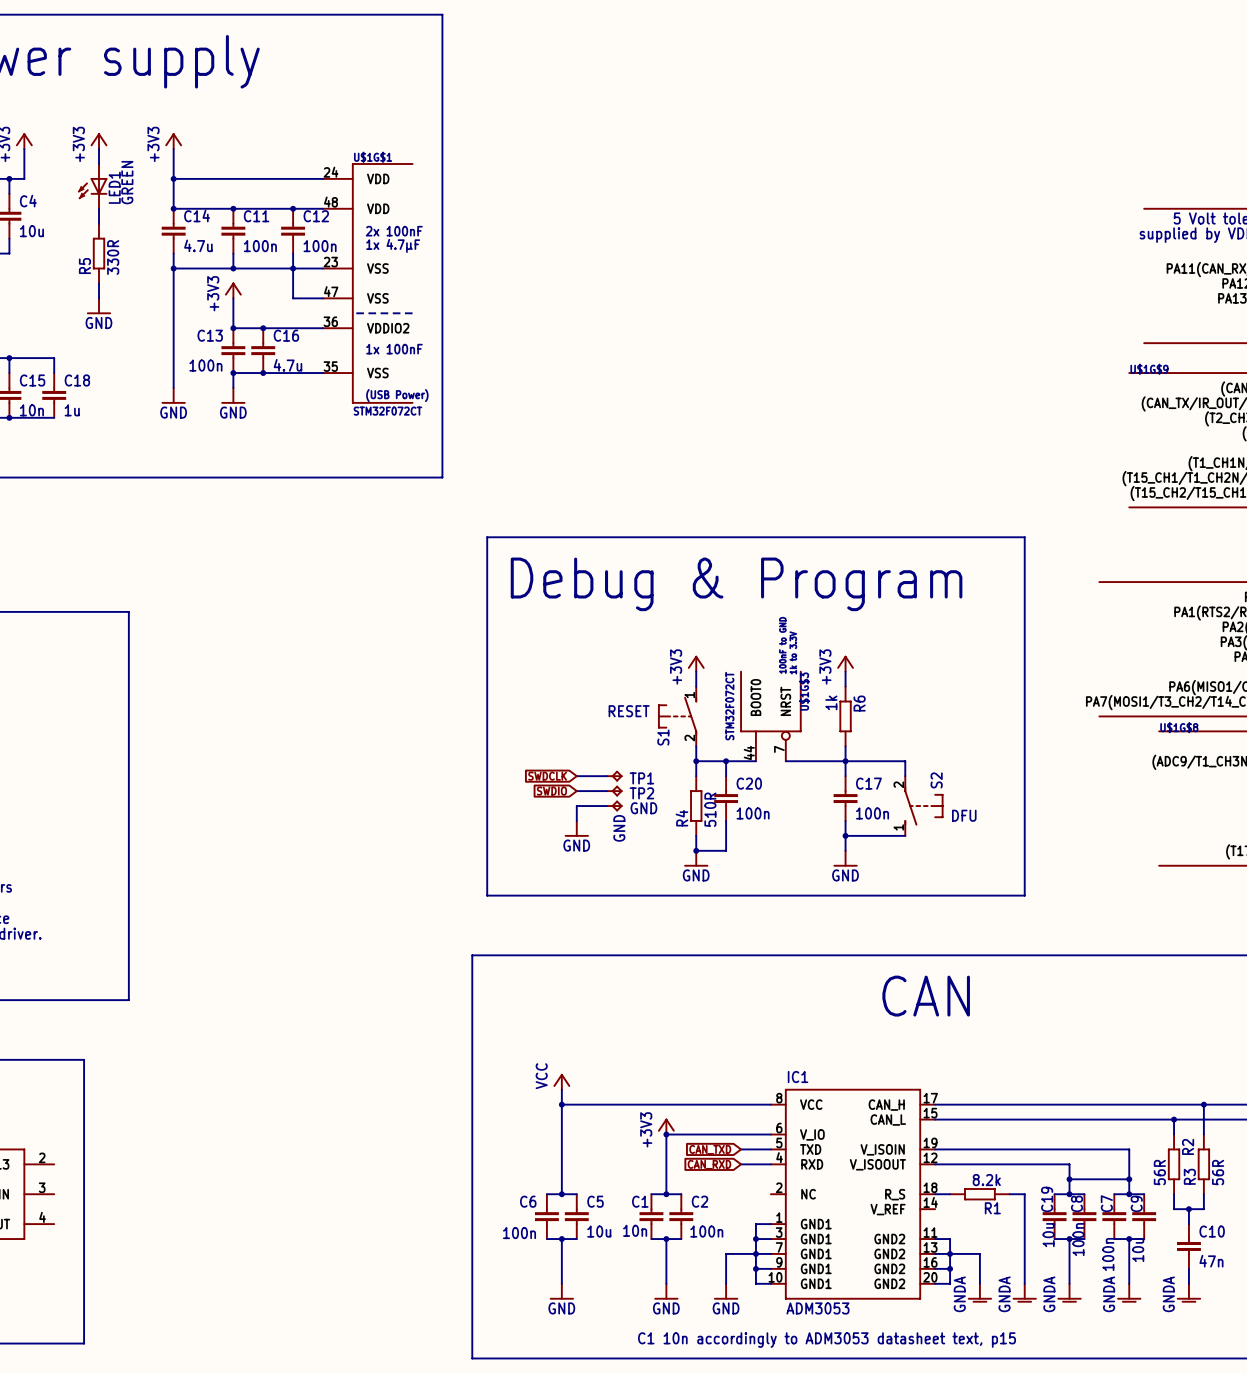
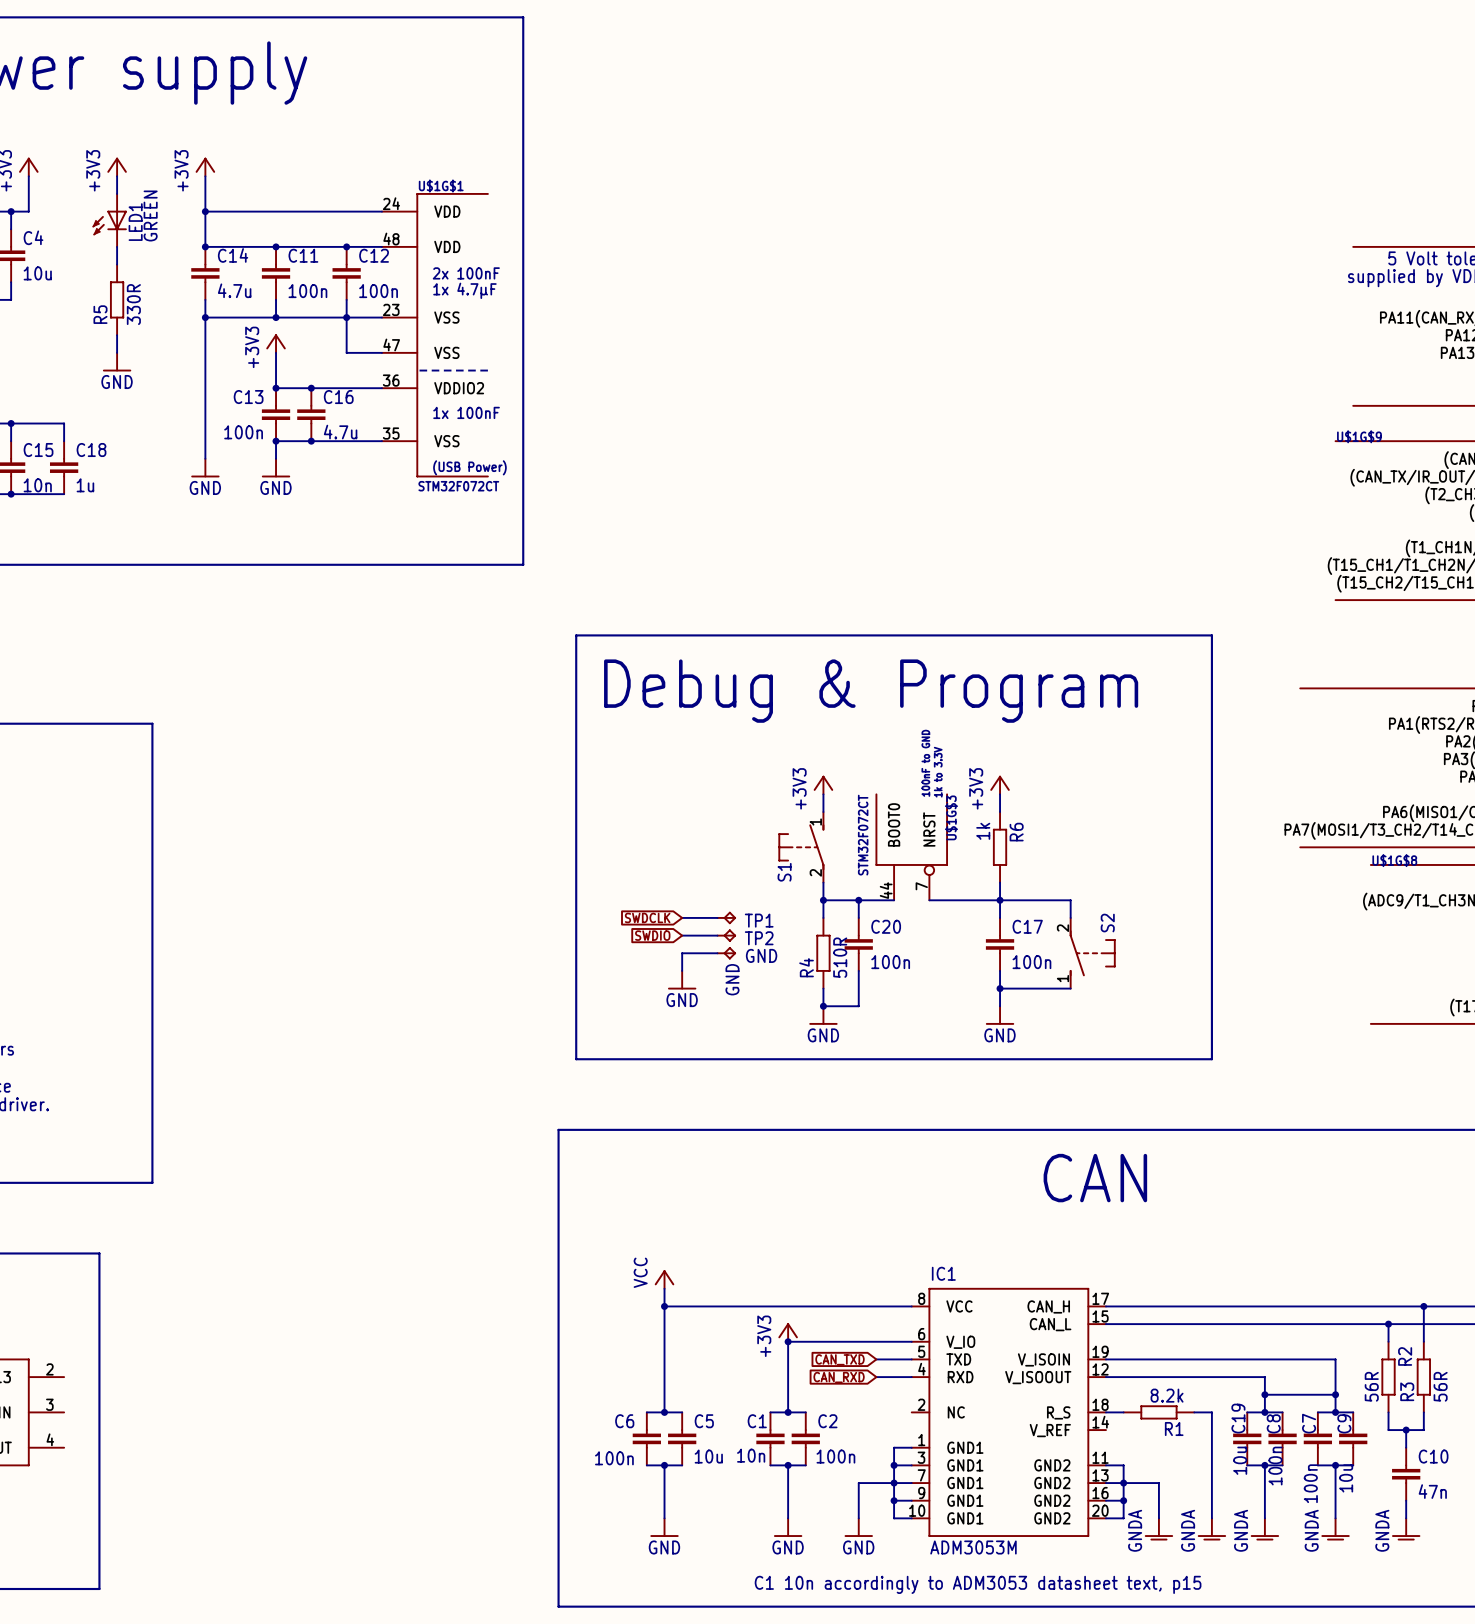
text: RESET (629, 711) -> none
text: DFU (964, 815) -> none
IC1 value: ADM3053 (817, 1308) -> ADM3053M (973, 1547)

